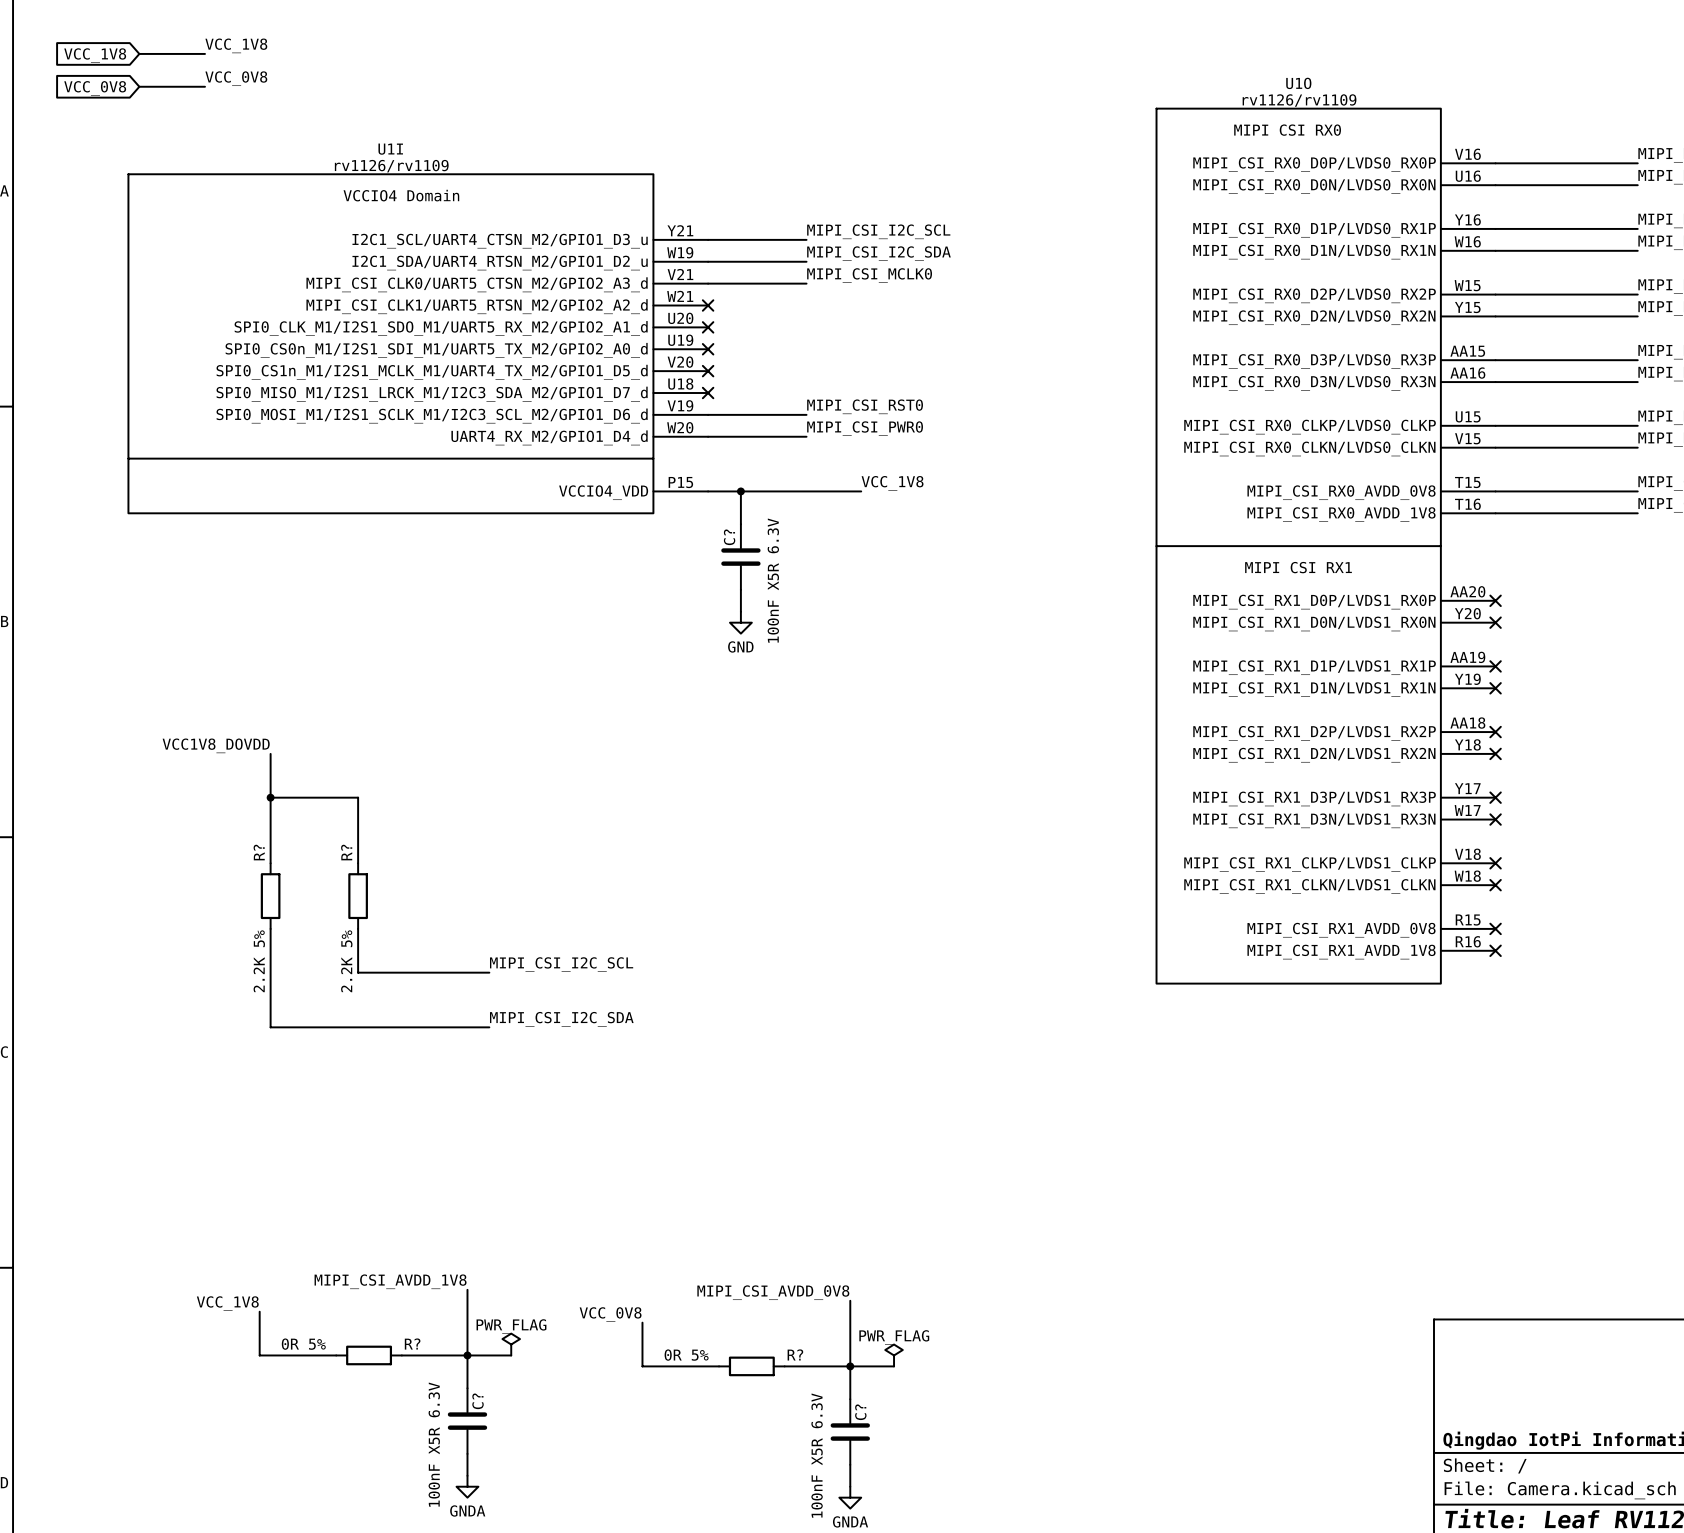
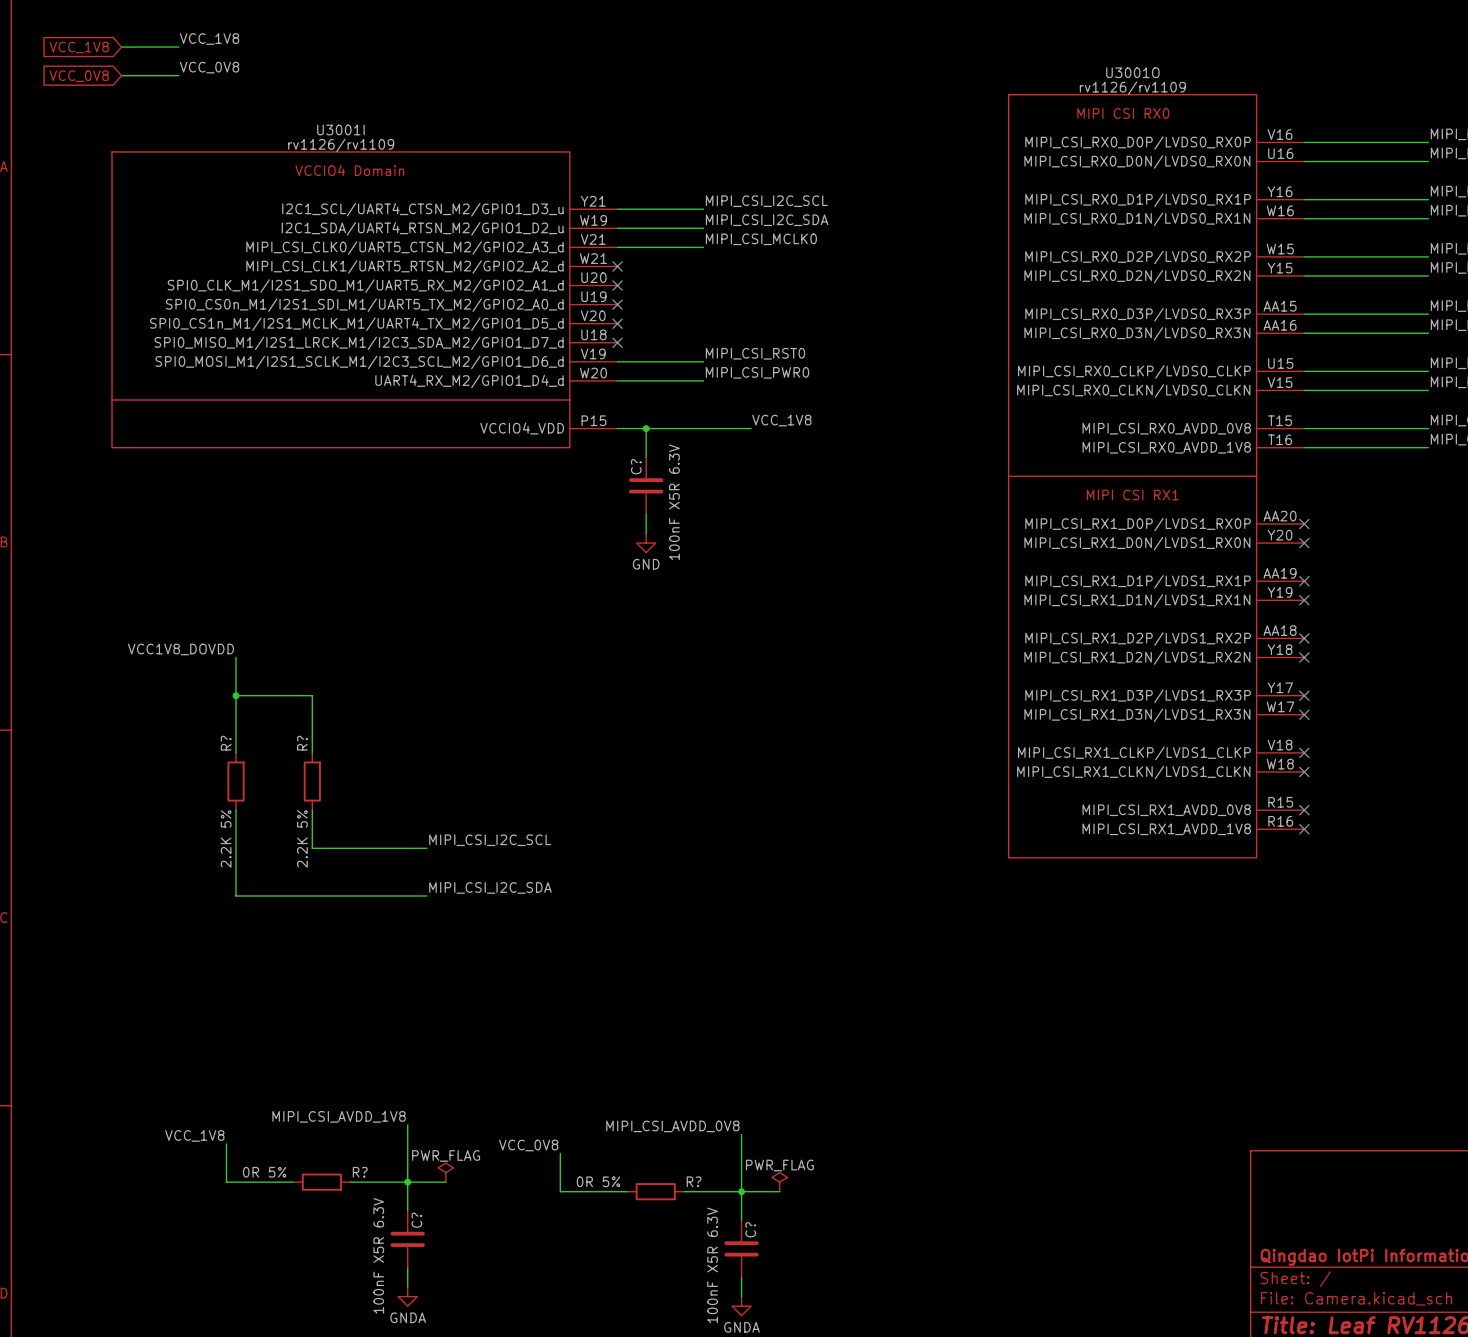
U1O name: U1O (1298, 83) -> U3001O (1132, 72)
U1I name: U1I (390, 149) -> U3001I (340, 129)

